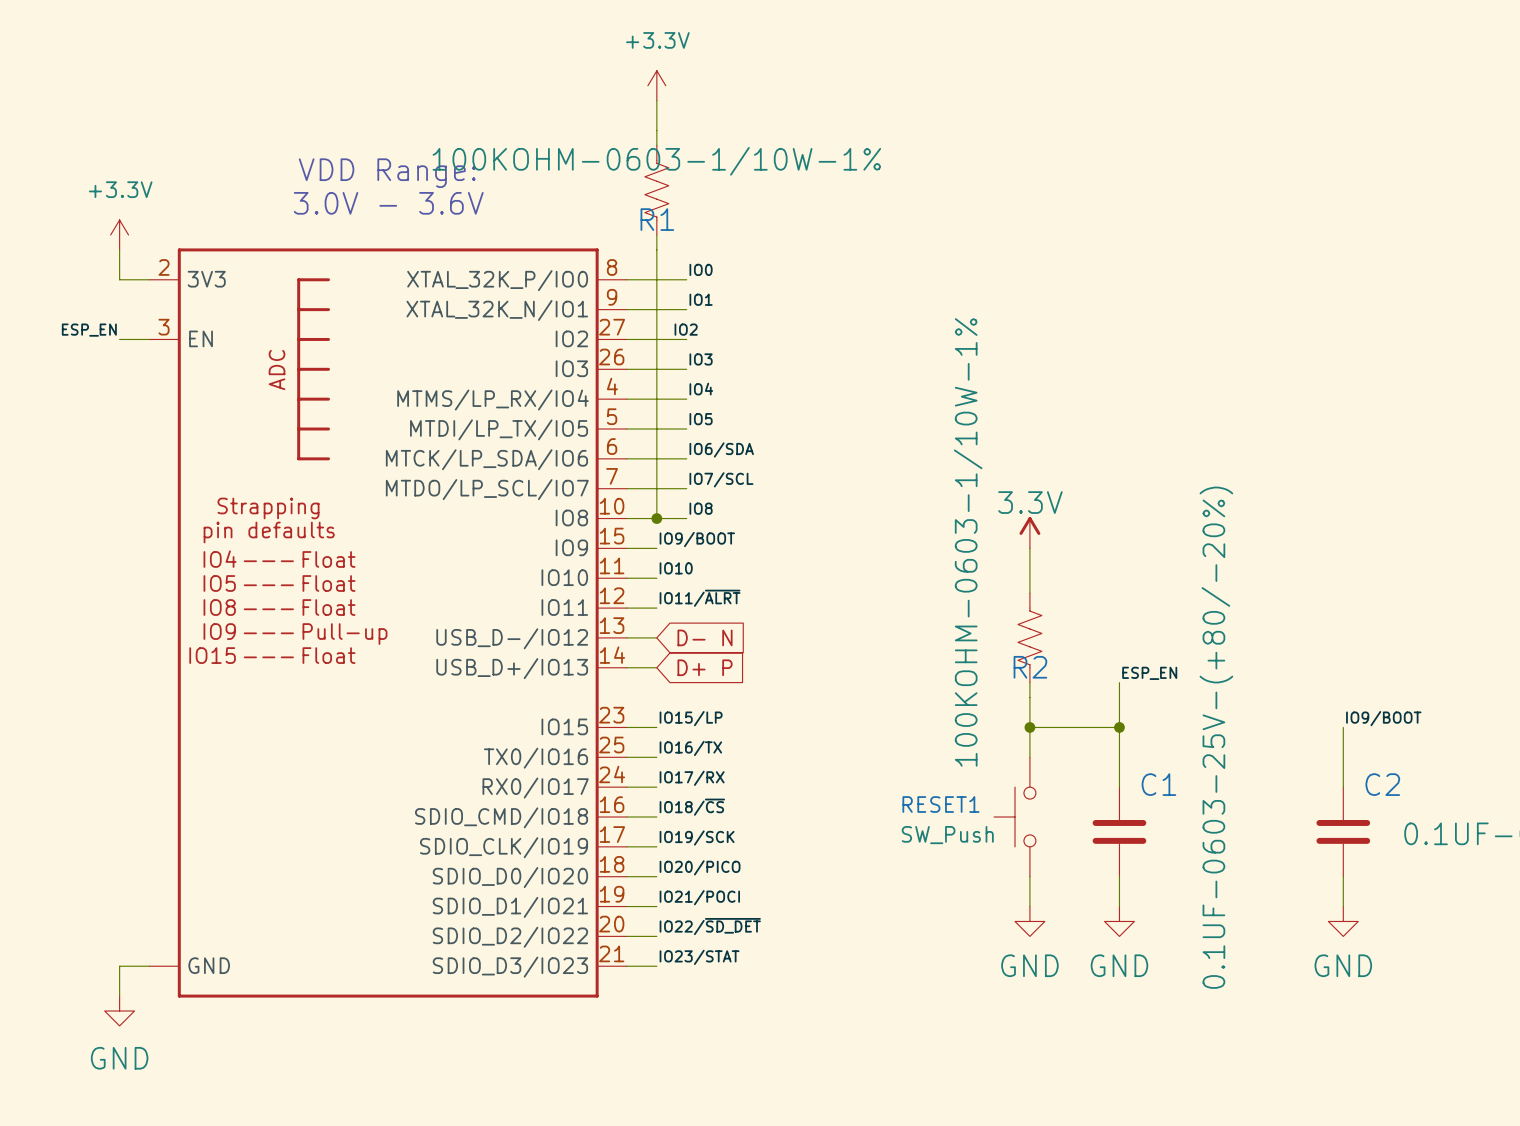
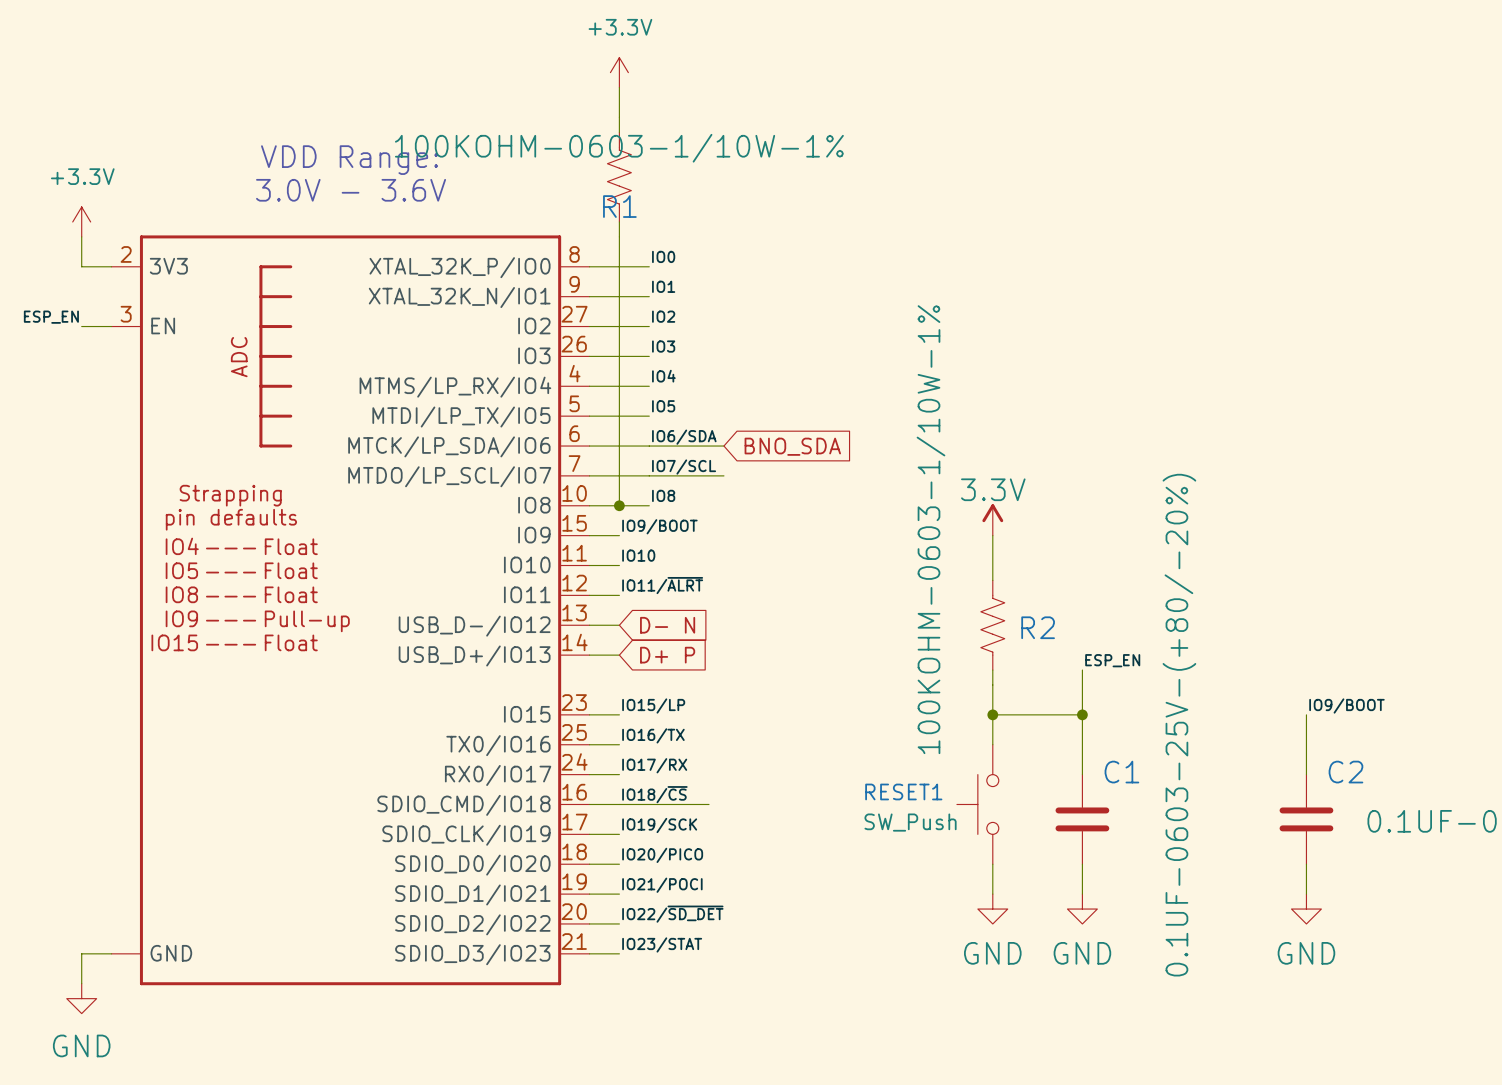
label position: IO2 (686, 329) -> IO2 (663, 316)
wire: none -> (649, 446) (723, 446)
global label: none -> BNO_SDA (792, 446)
wire: none -> (649, 475) (723, 475)
R2 name position: R2 (1030, 667) -> R2 (1038, 627)
wire: none -> (619, 804) (709, 804)

